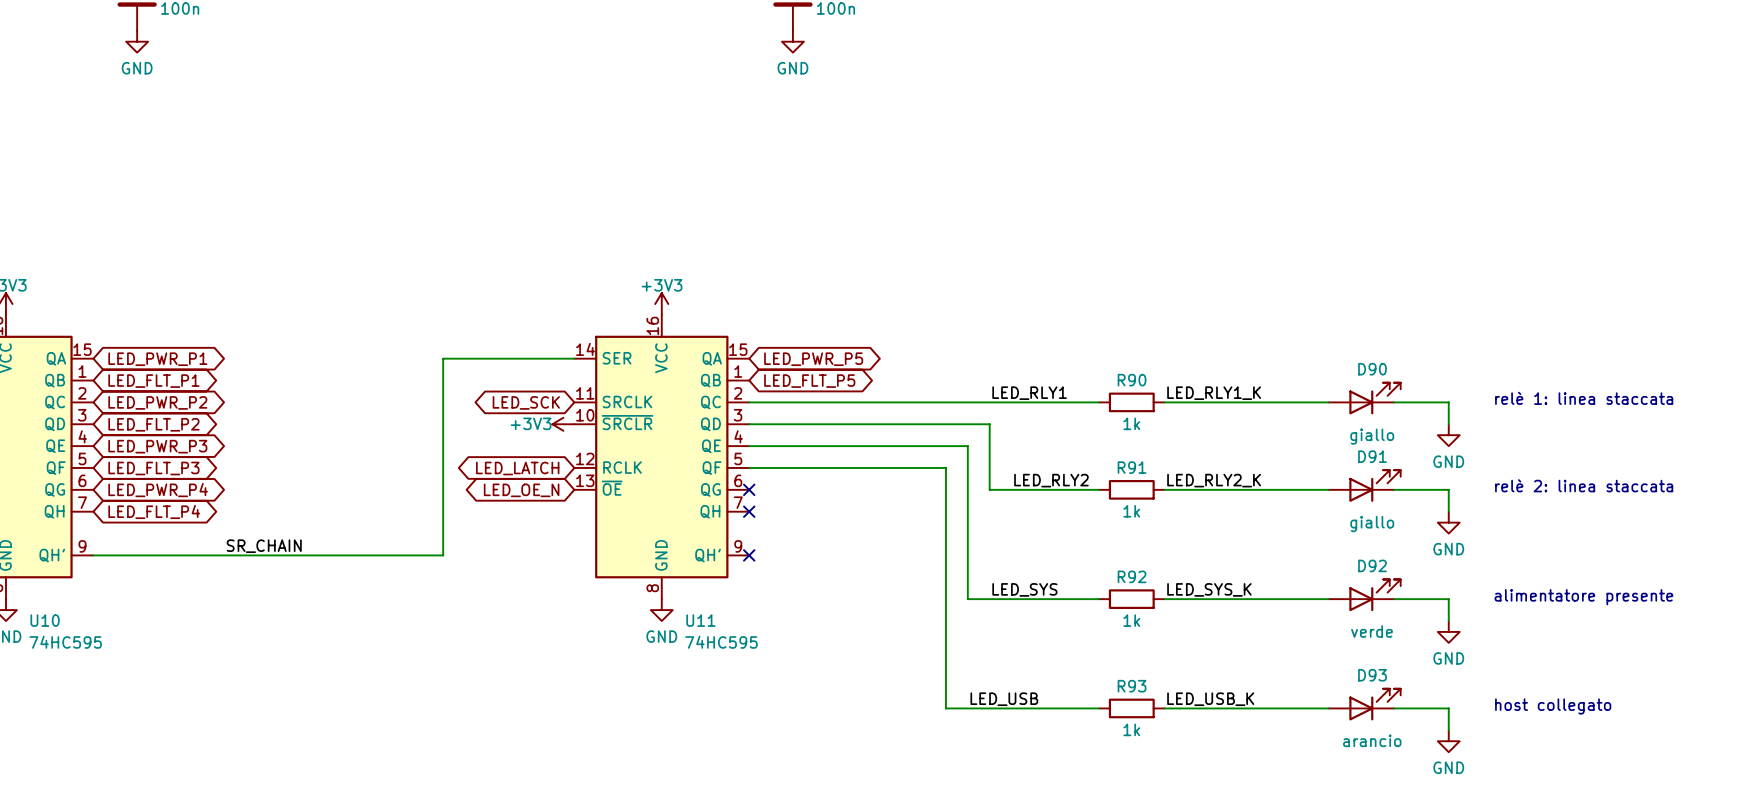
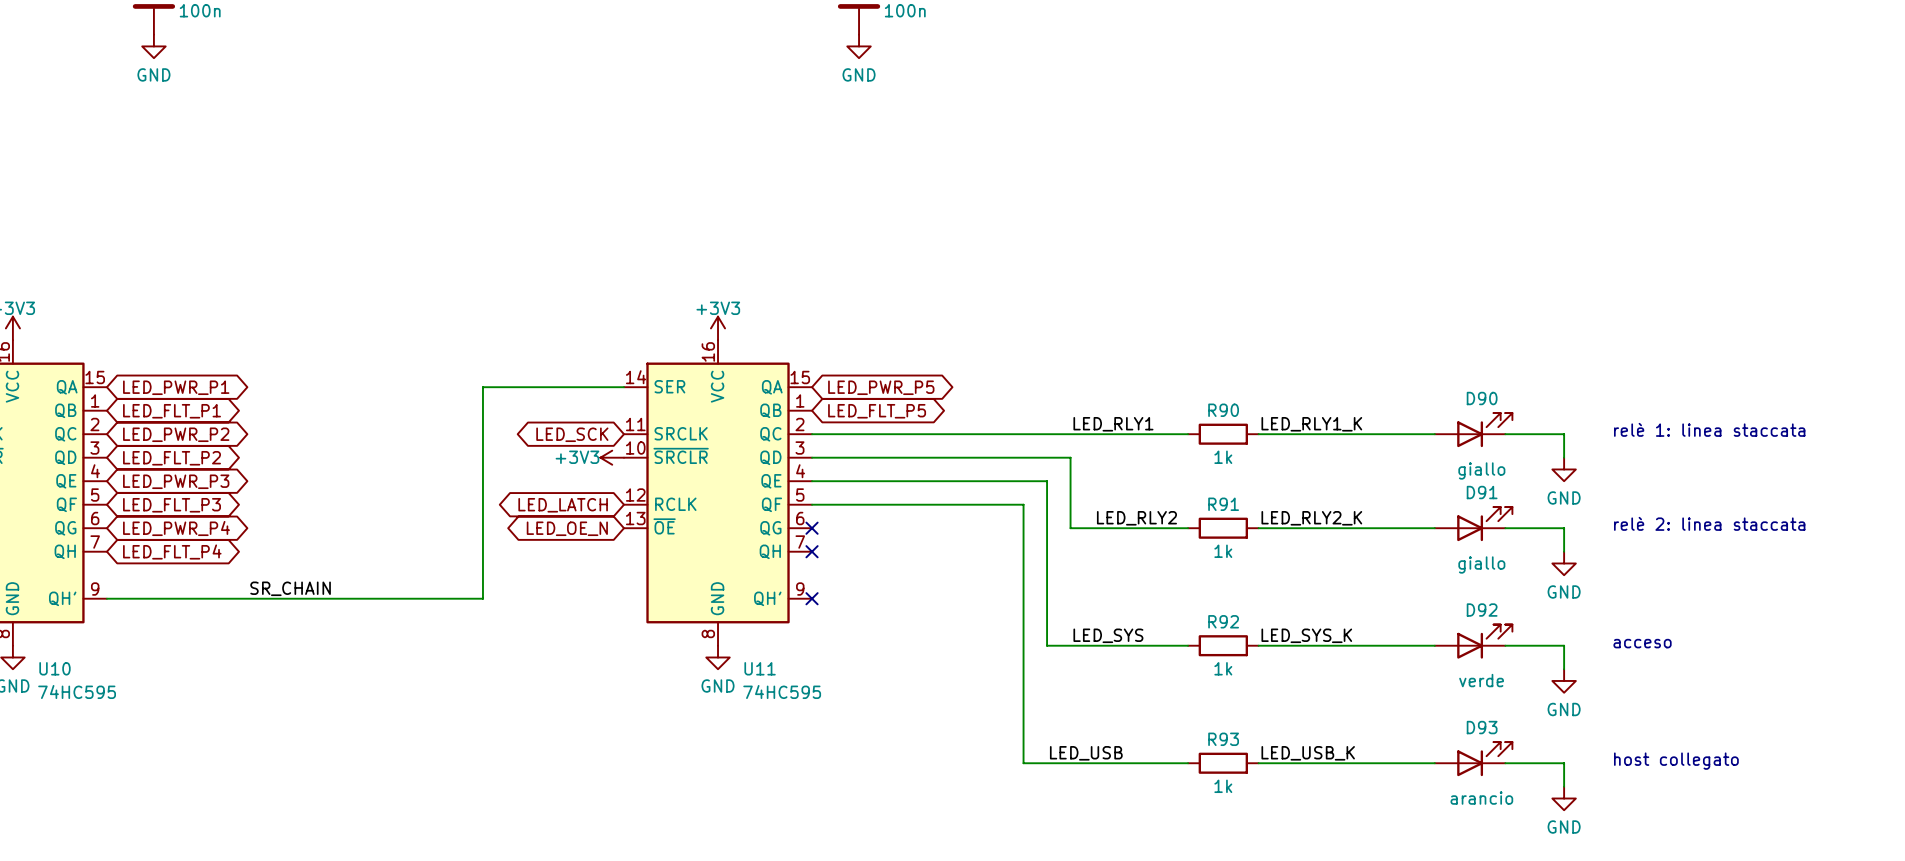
text: alimentatore presente (1583, 597) -> acceso (1642, 643)

